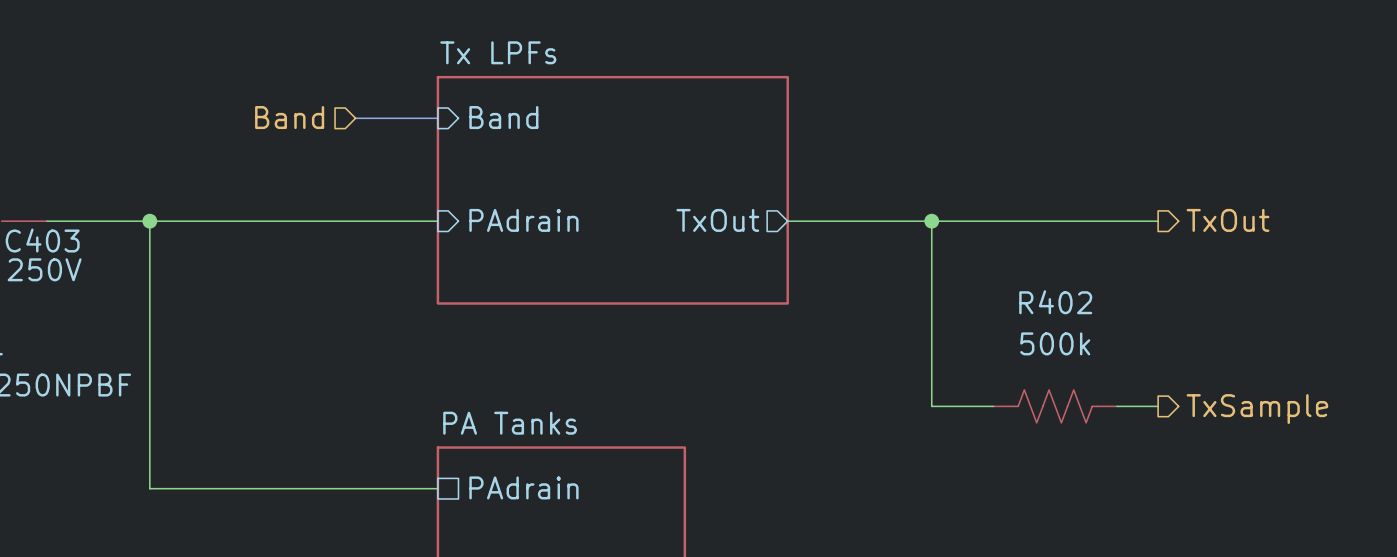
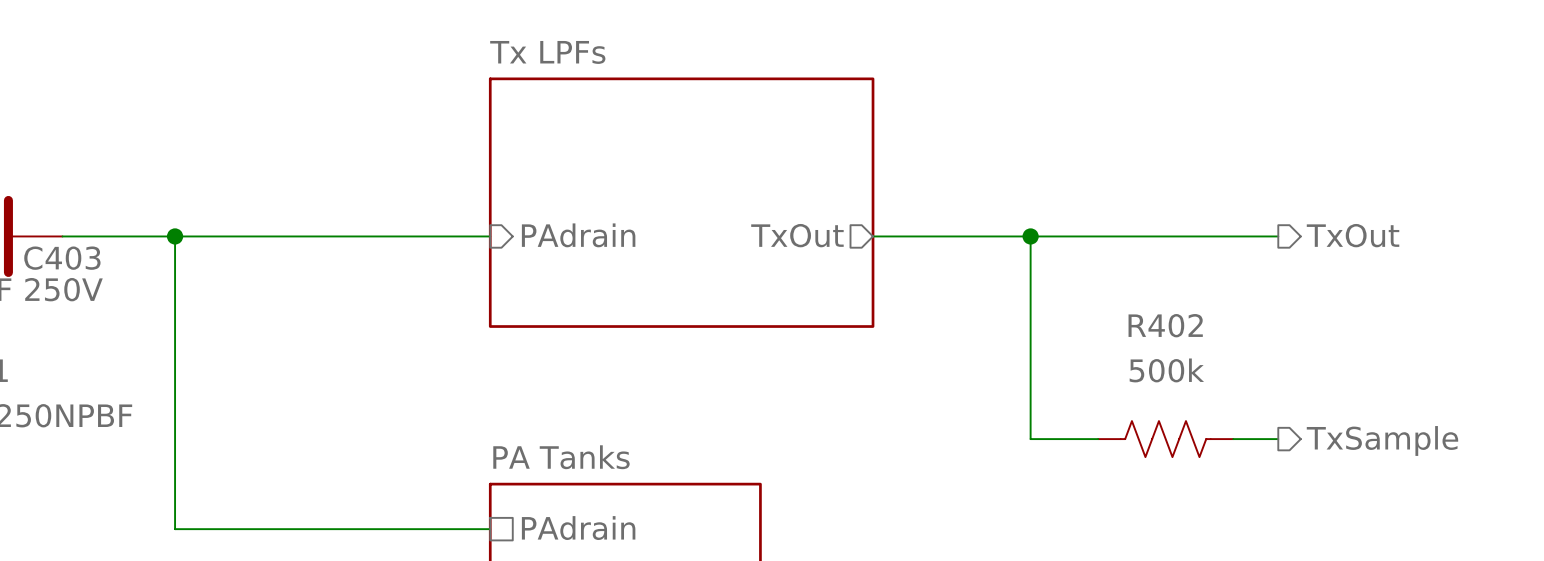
hierarchical label: Band (289, 117) -> none
sheet pin: Band (503, 117) -> none
bus: (355, 118) (437, 118) -> none

